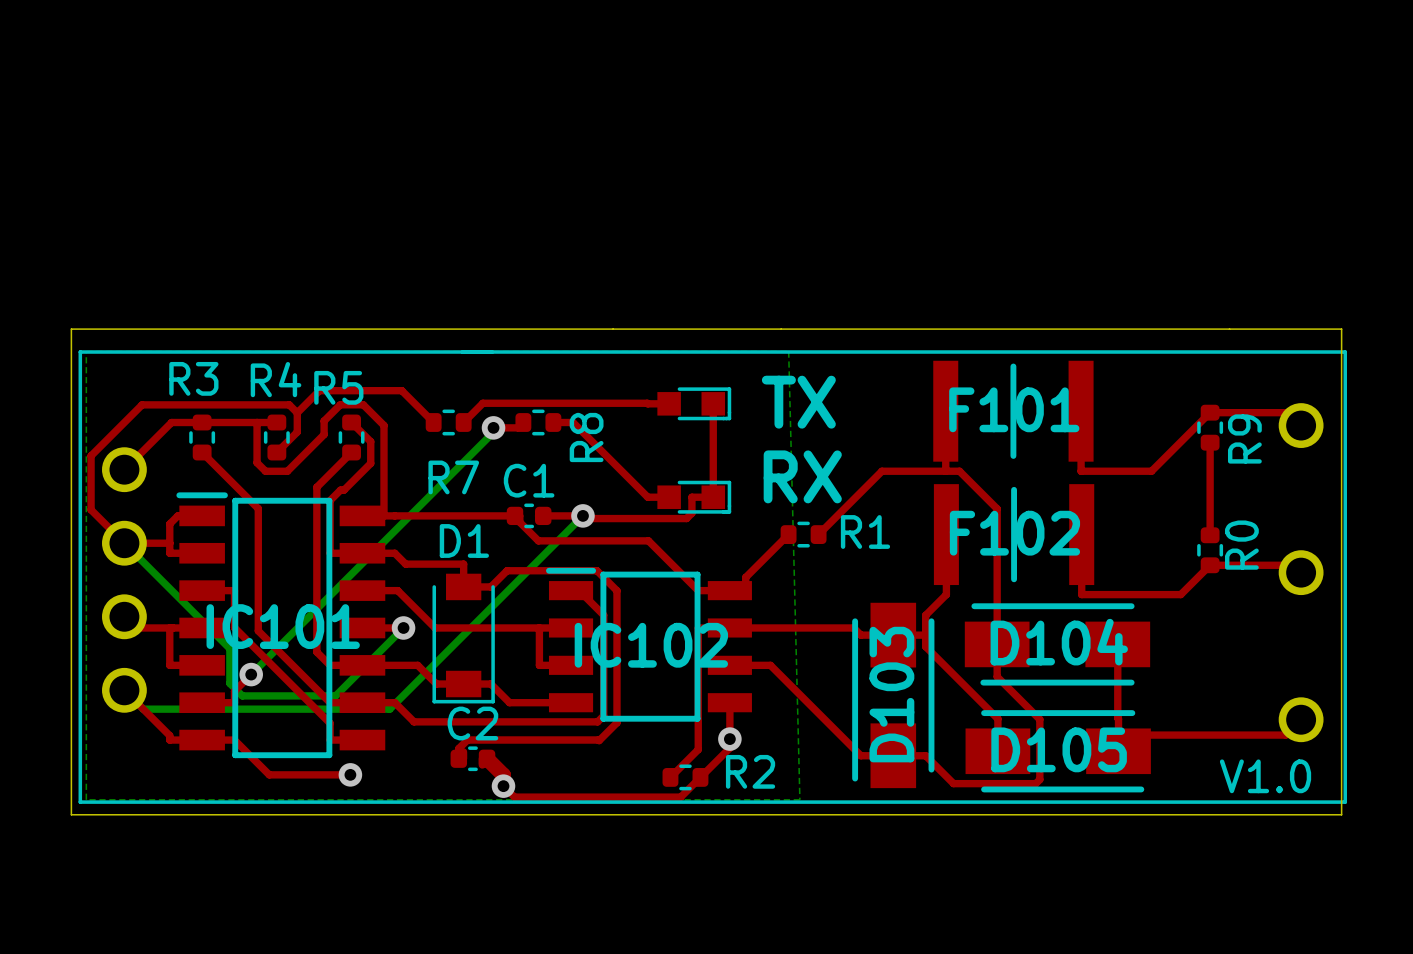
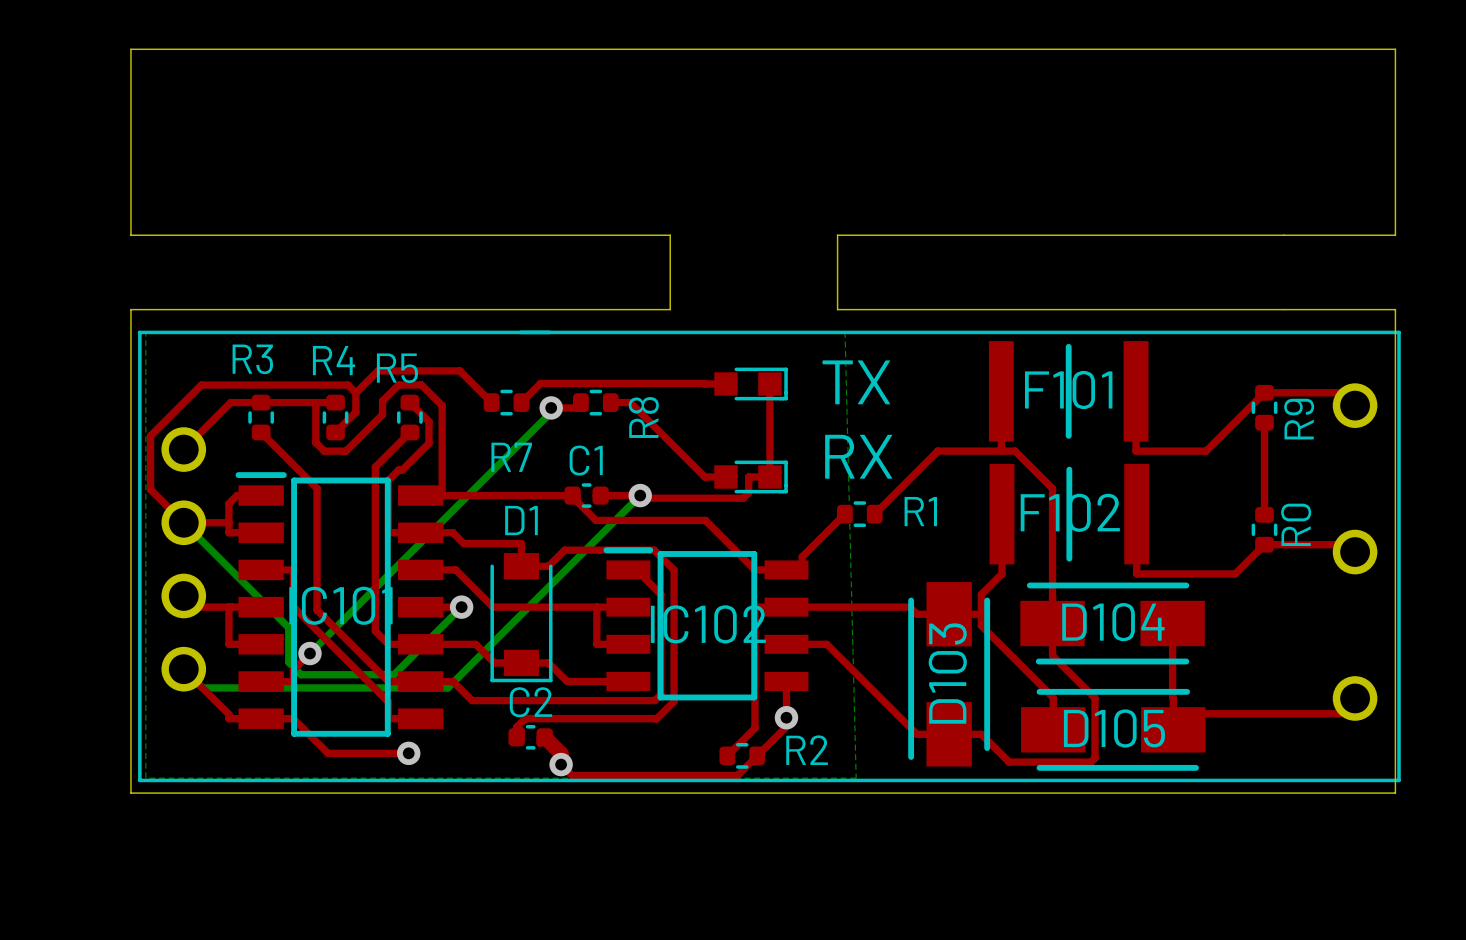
board edge: (613, 329) (781, 329) -> (670, 309) (670, 235) (130, 235) (130, 49) (1395, 49) (1395, 235) (837, 235) (837, 309)
text: V1.0 (1265, 776) -> none

